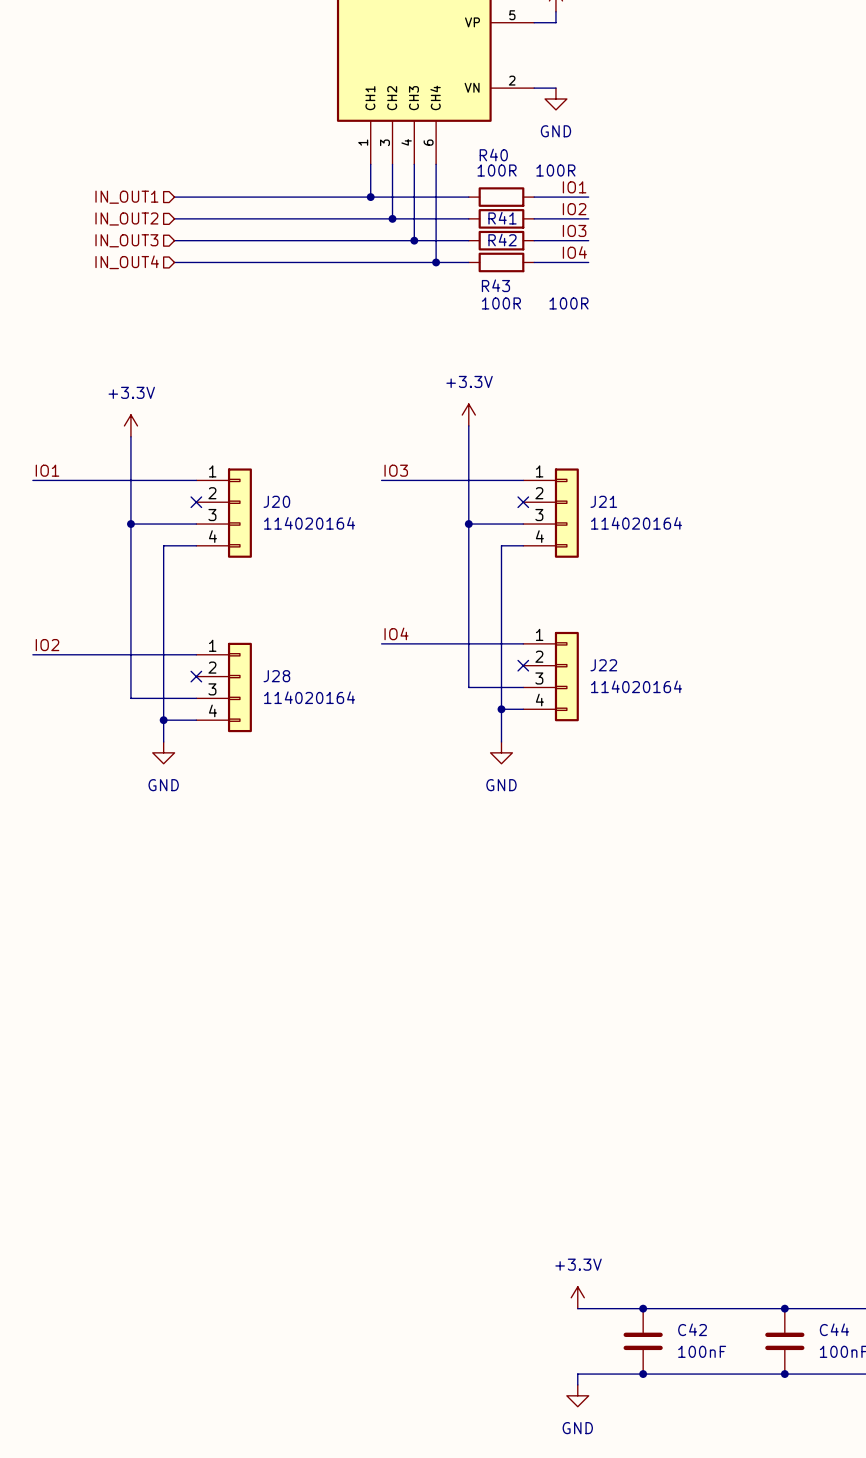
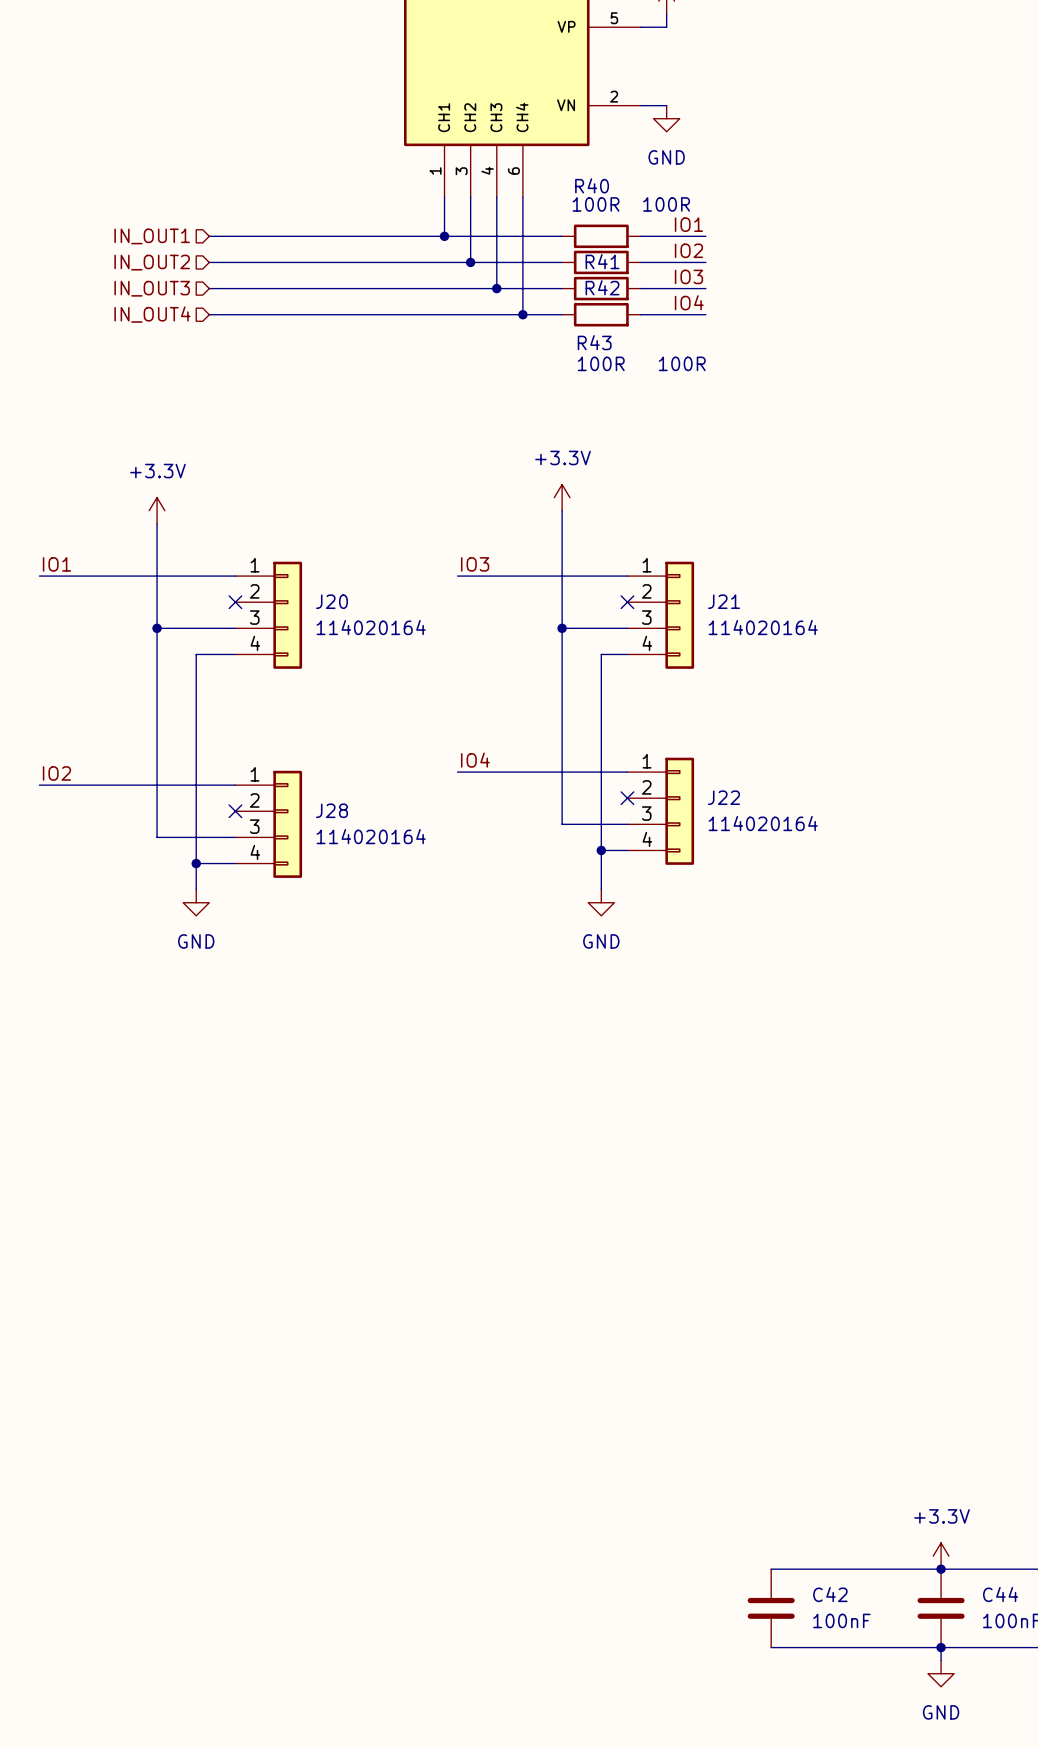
power symbol position: +3.3V (577, 1297) -> +3.3V (941, 1556)
wire: (577, 1308) (643, 1308) -> none
junction: (643, 1308) -> none
wire: (643, 1374) (577, 1374) (577, 1384) -> none
junction: (643, 1374) -> none
wire: none -> (941, 1647) (941, 1660)
power symbol position: GND (577, 1395) -> GND (941, 1673)

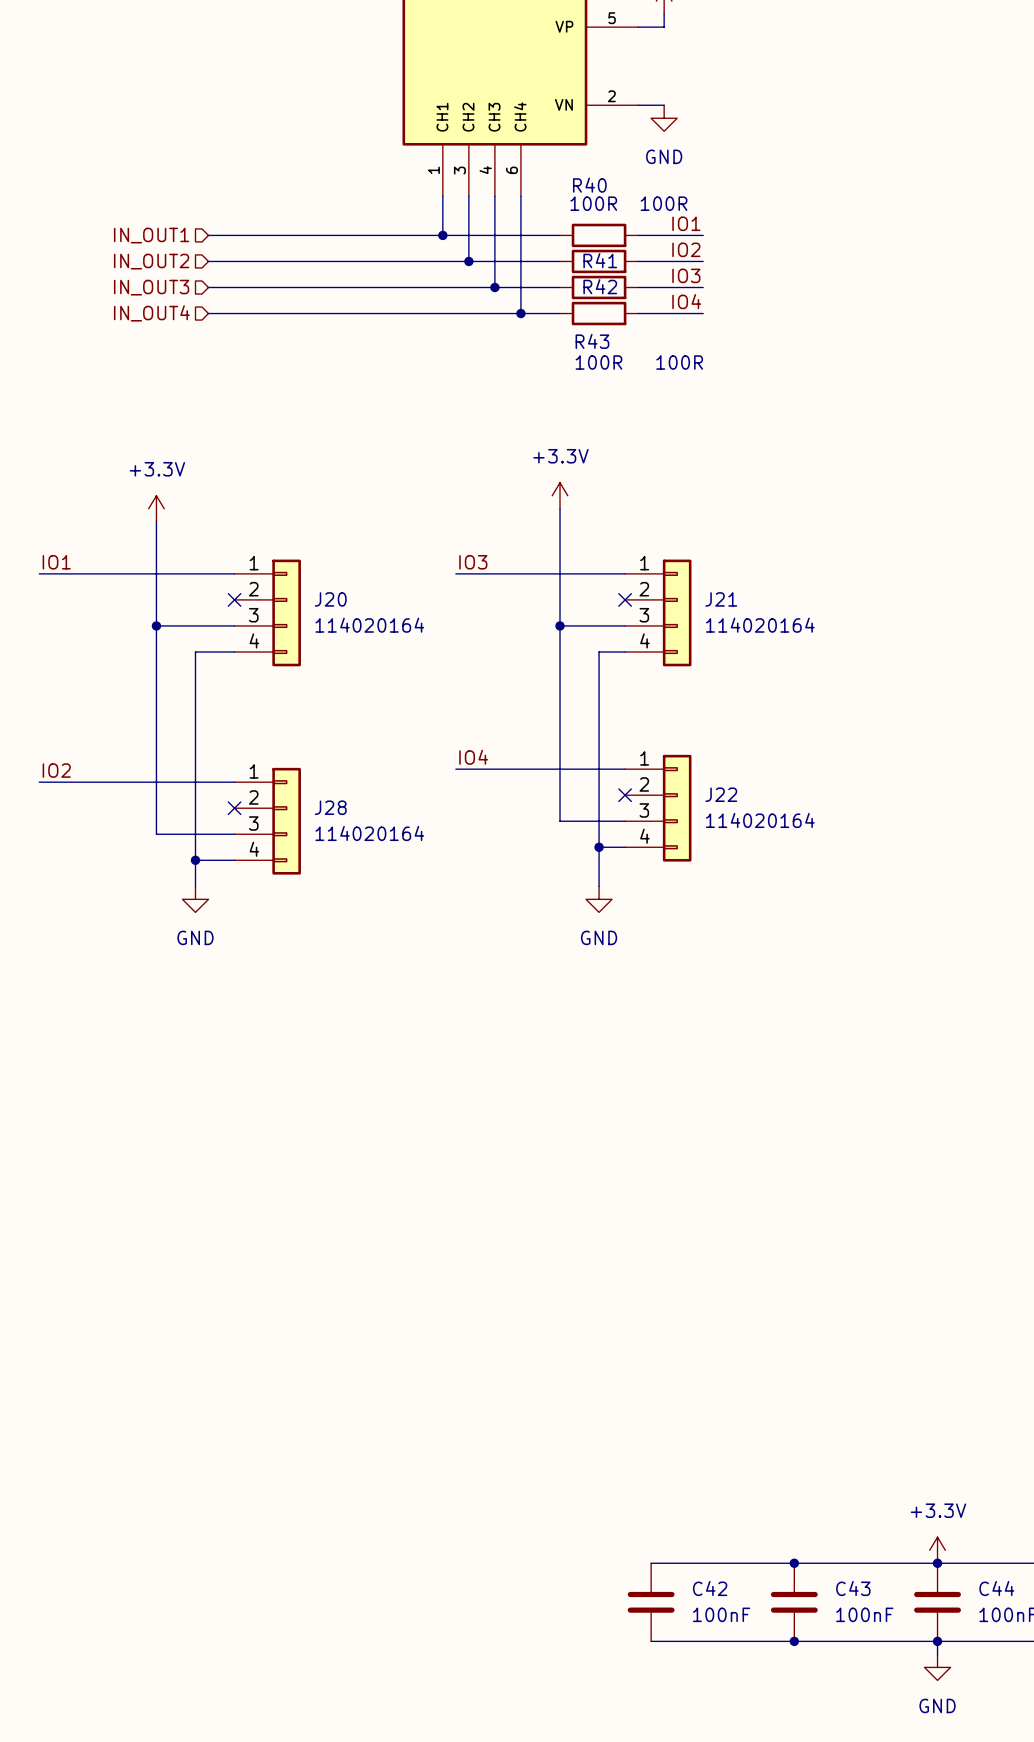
wire: none -> (651, 1563) (768, 1563)
junction: none -> (794, 1563)
C42 position: (771, 1608) -> (651, 1602)
C43: none -> 100nF (794, 1602)
wire: none -> (651, 1641) (768, 1641)
junction: none -> (794, 1641)

